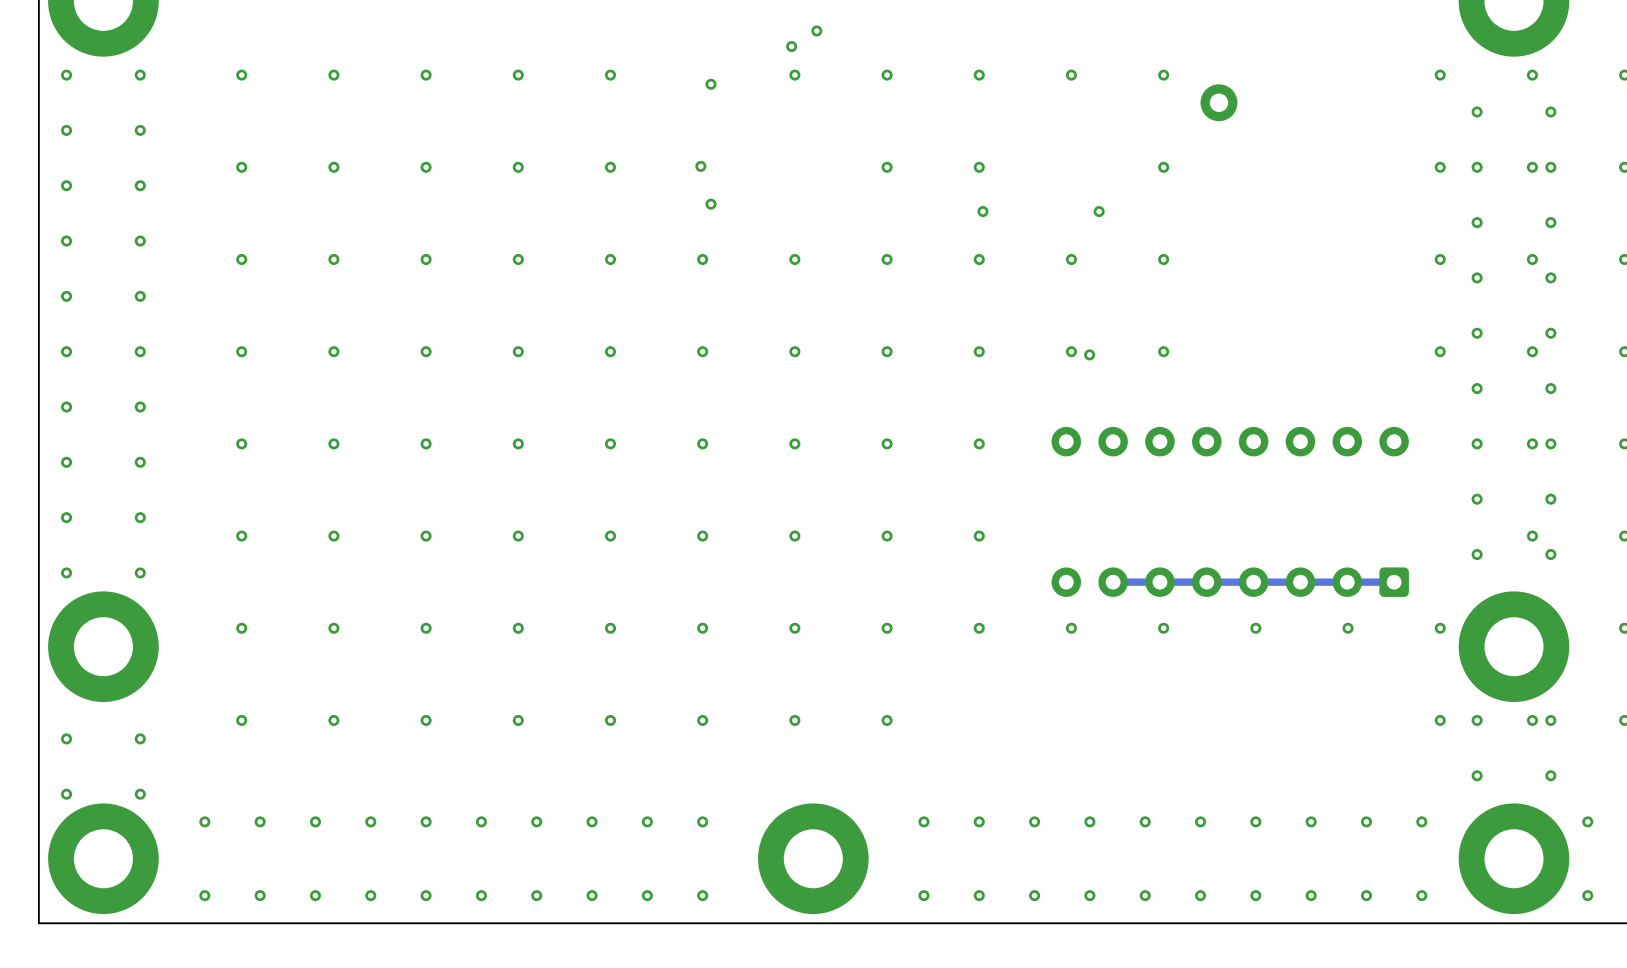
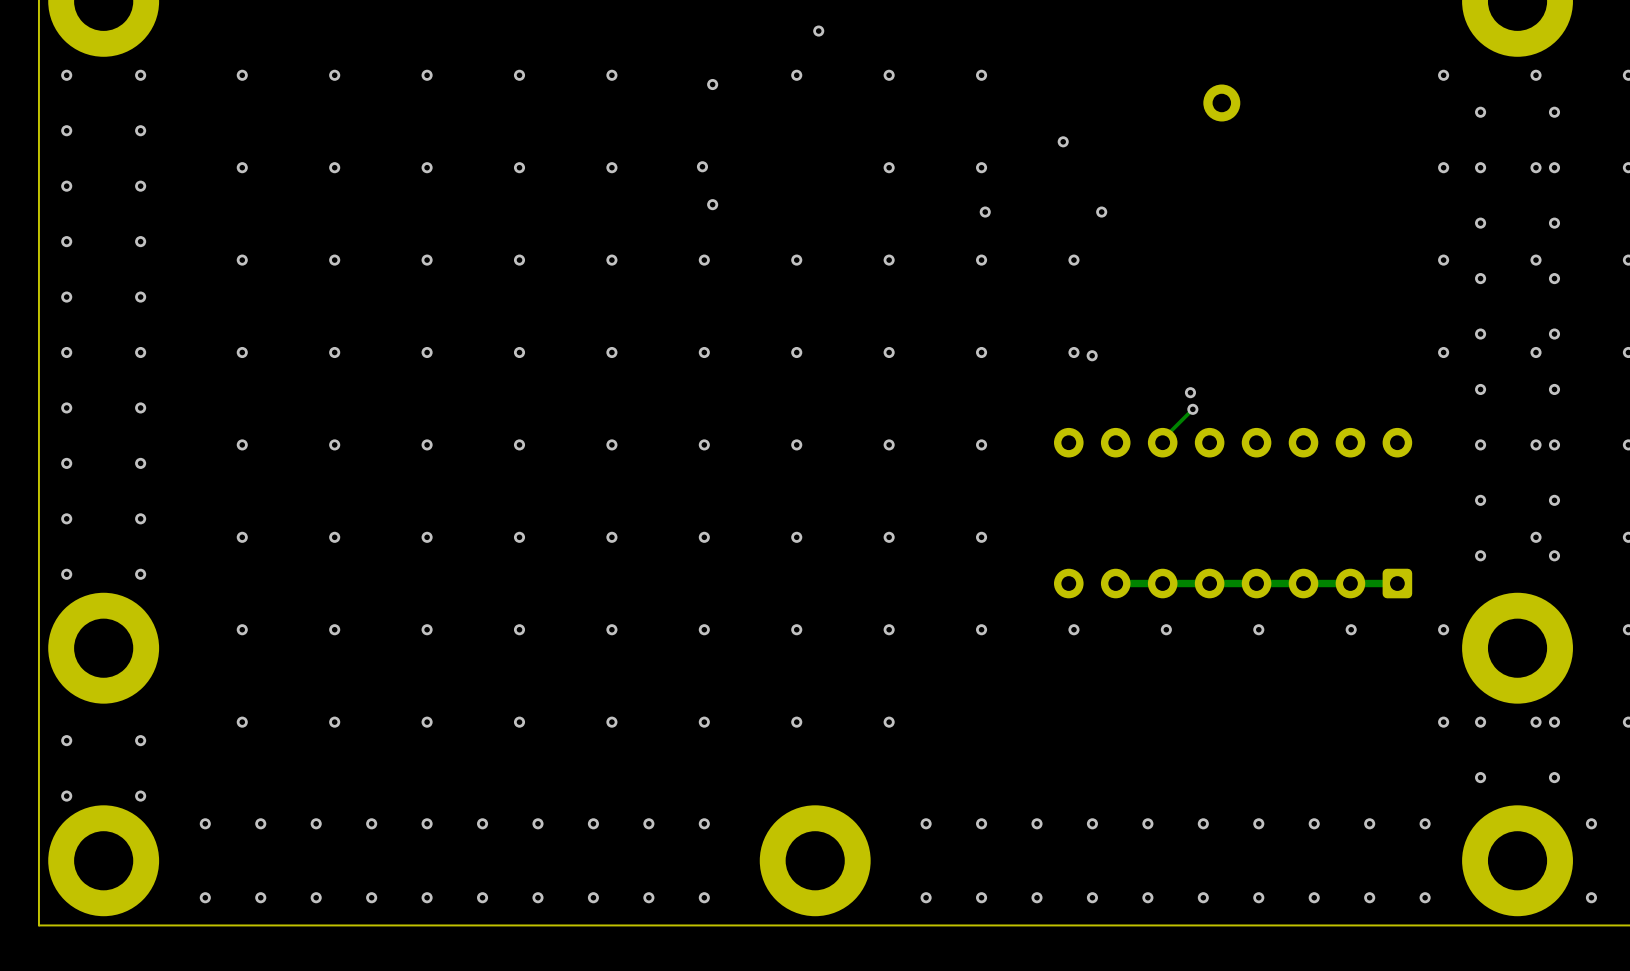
via: (791, 46) -> none
via: (1071, 75) -> none
via: (1163, 75) -> none
via: none -> (1063, 141)
via: (1163, 167) -> none
via: (1163, 259) -> none
via: (1163, 351) -> none
via: none -> (1190, 392)
track: none -> (1192, 409) (1162, 439) (1162, 442)
via: none -> (1192, 409)

